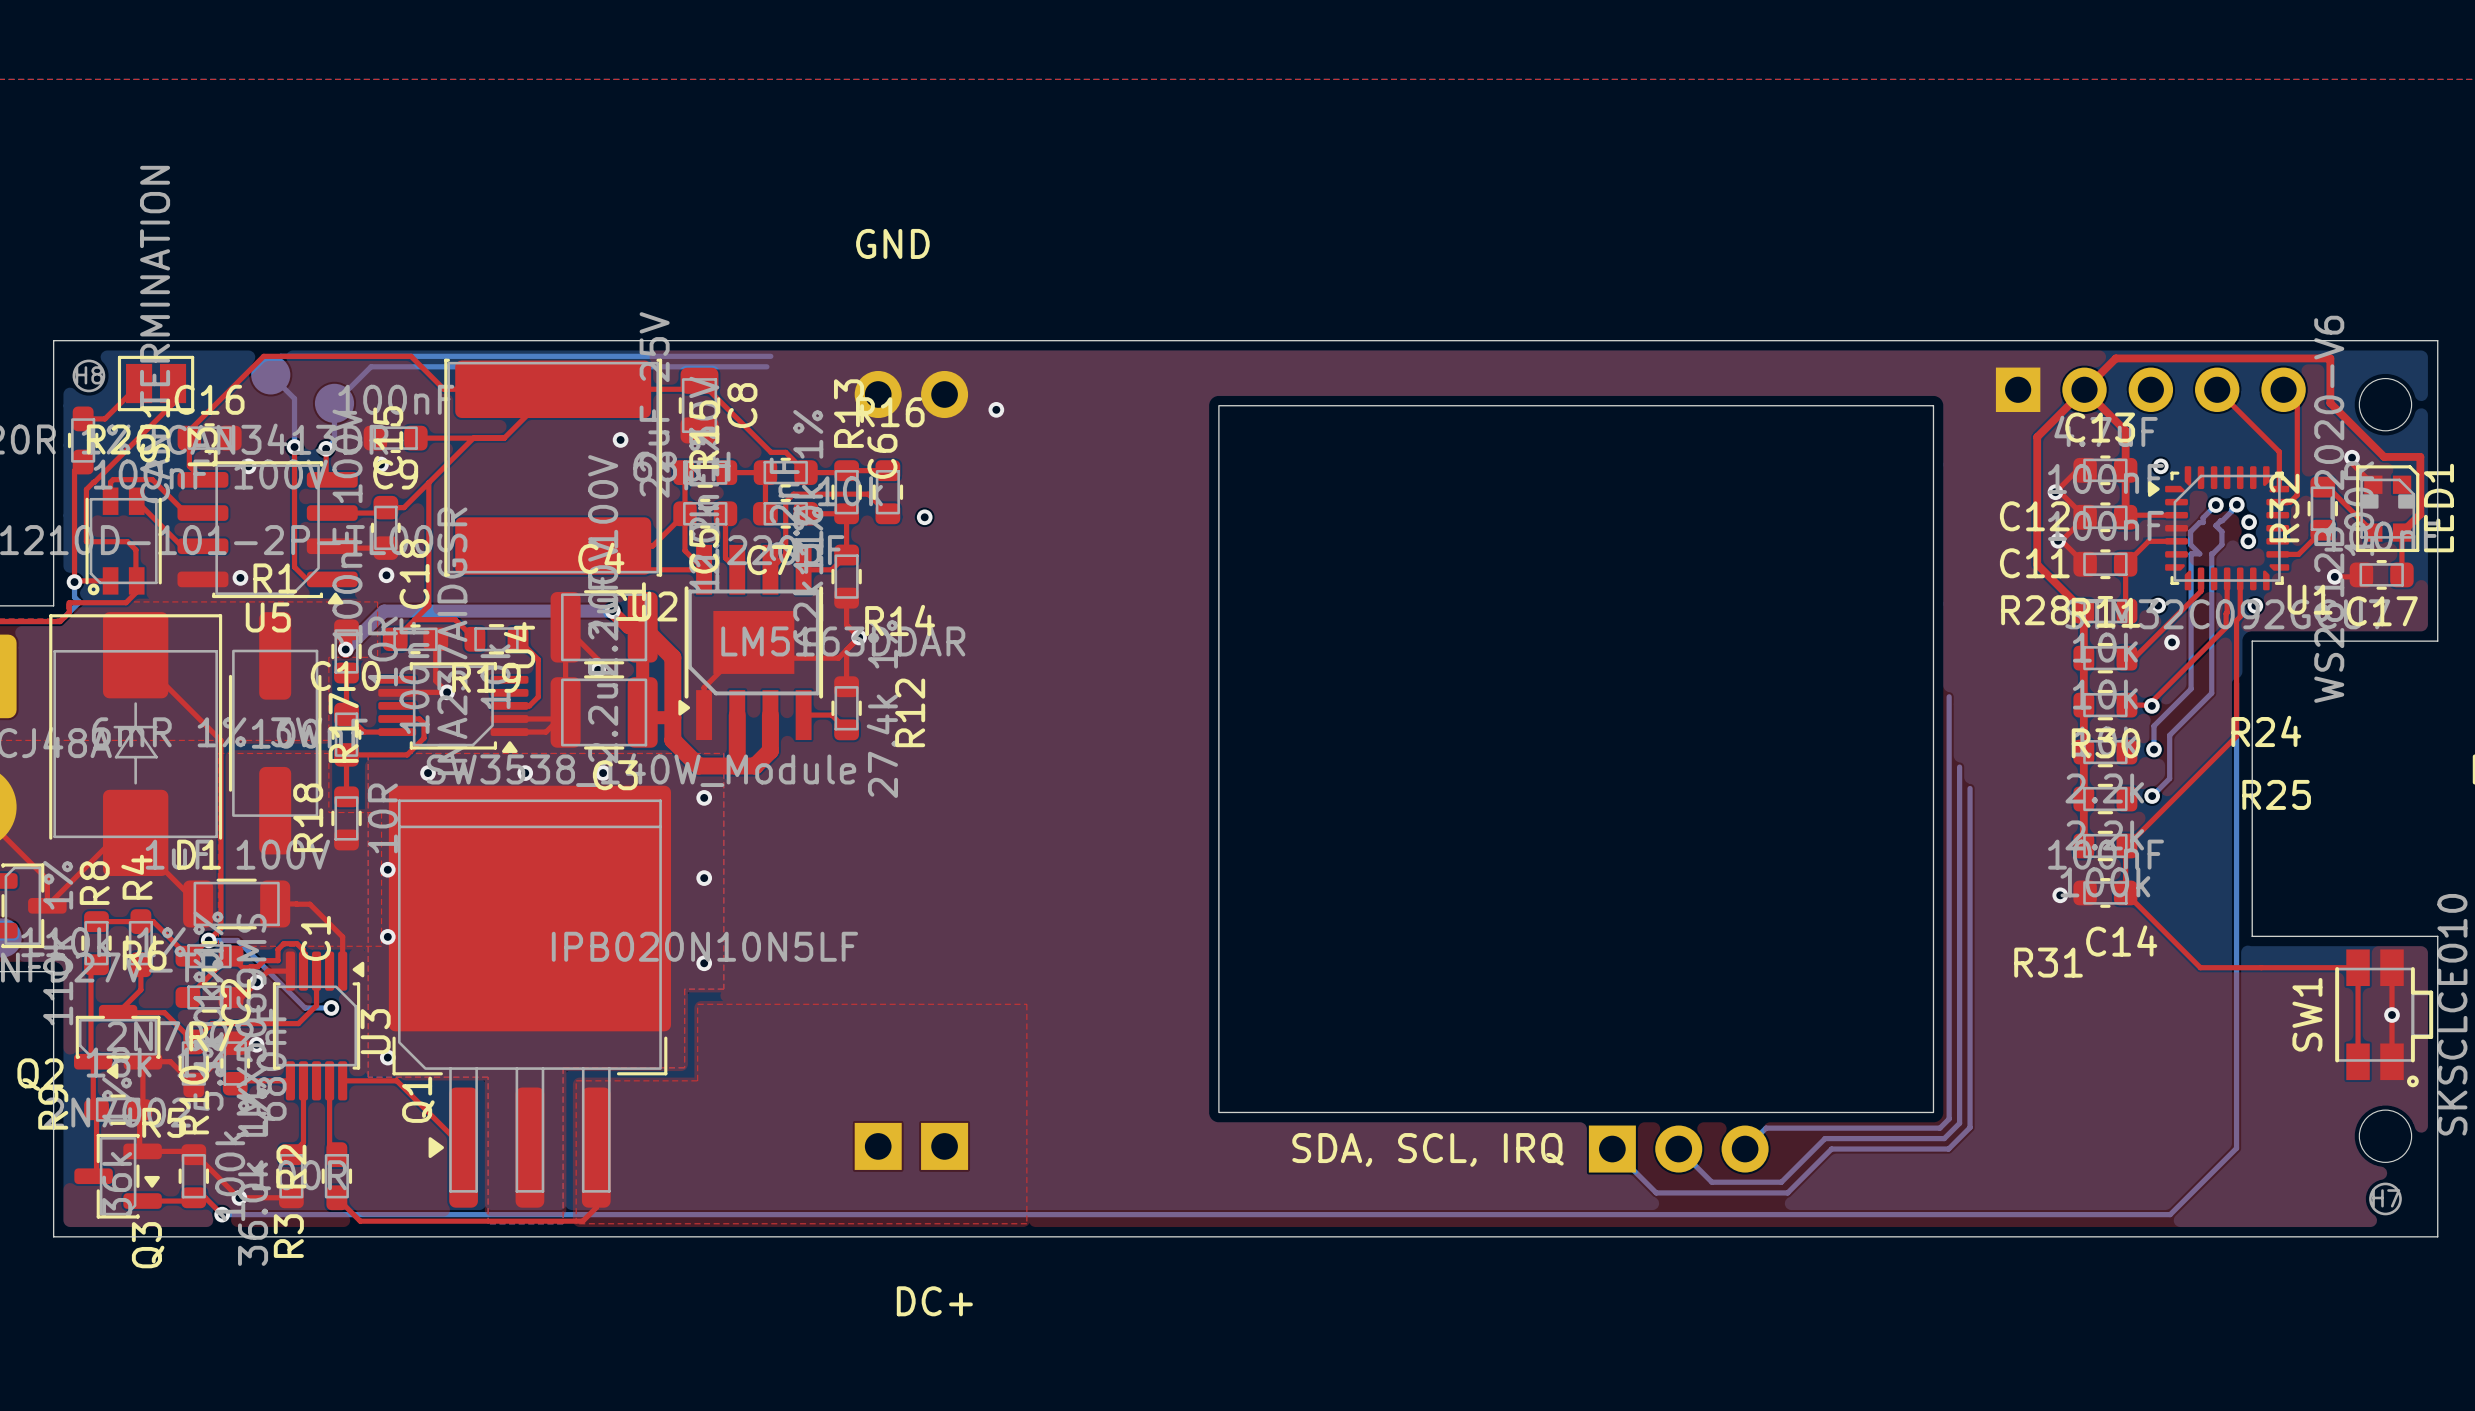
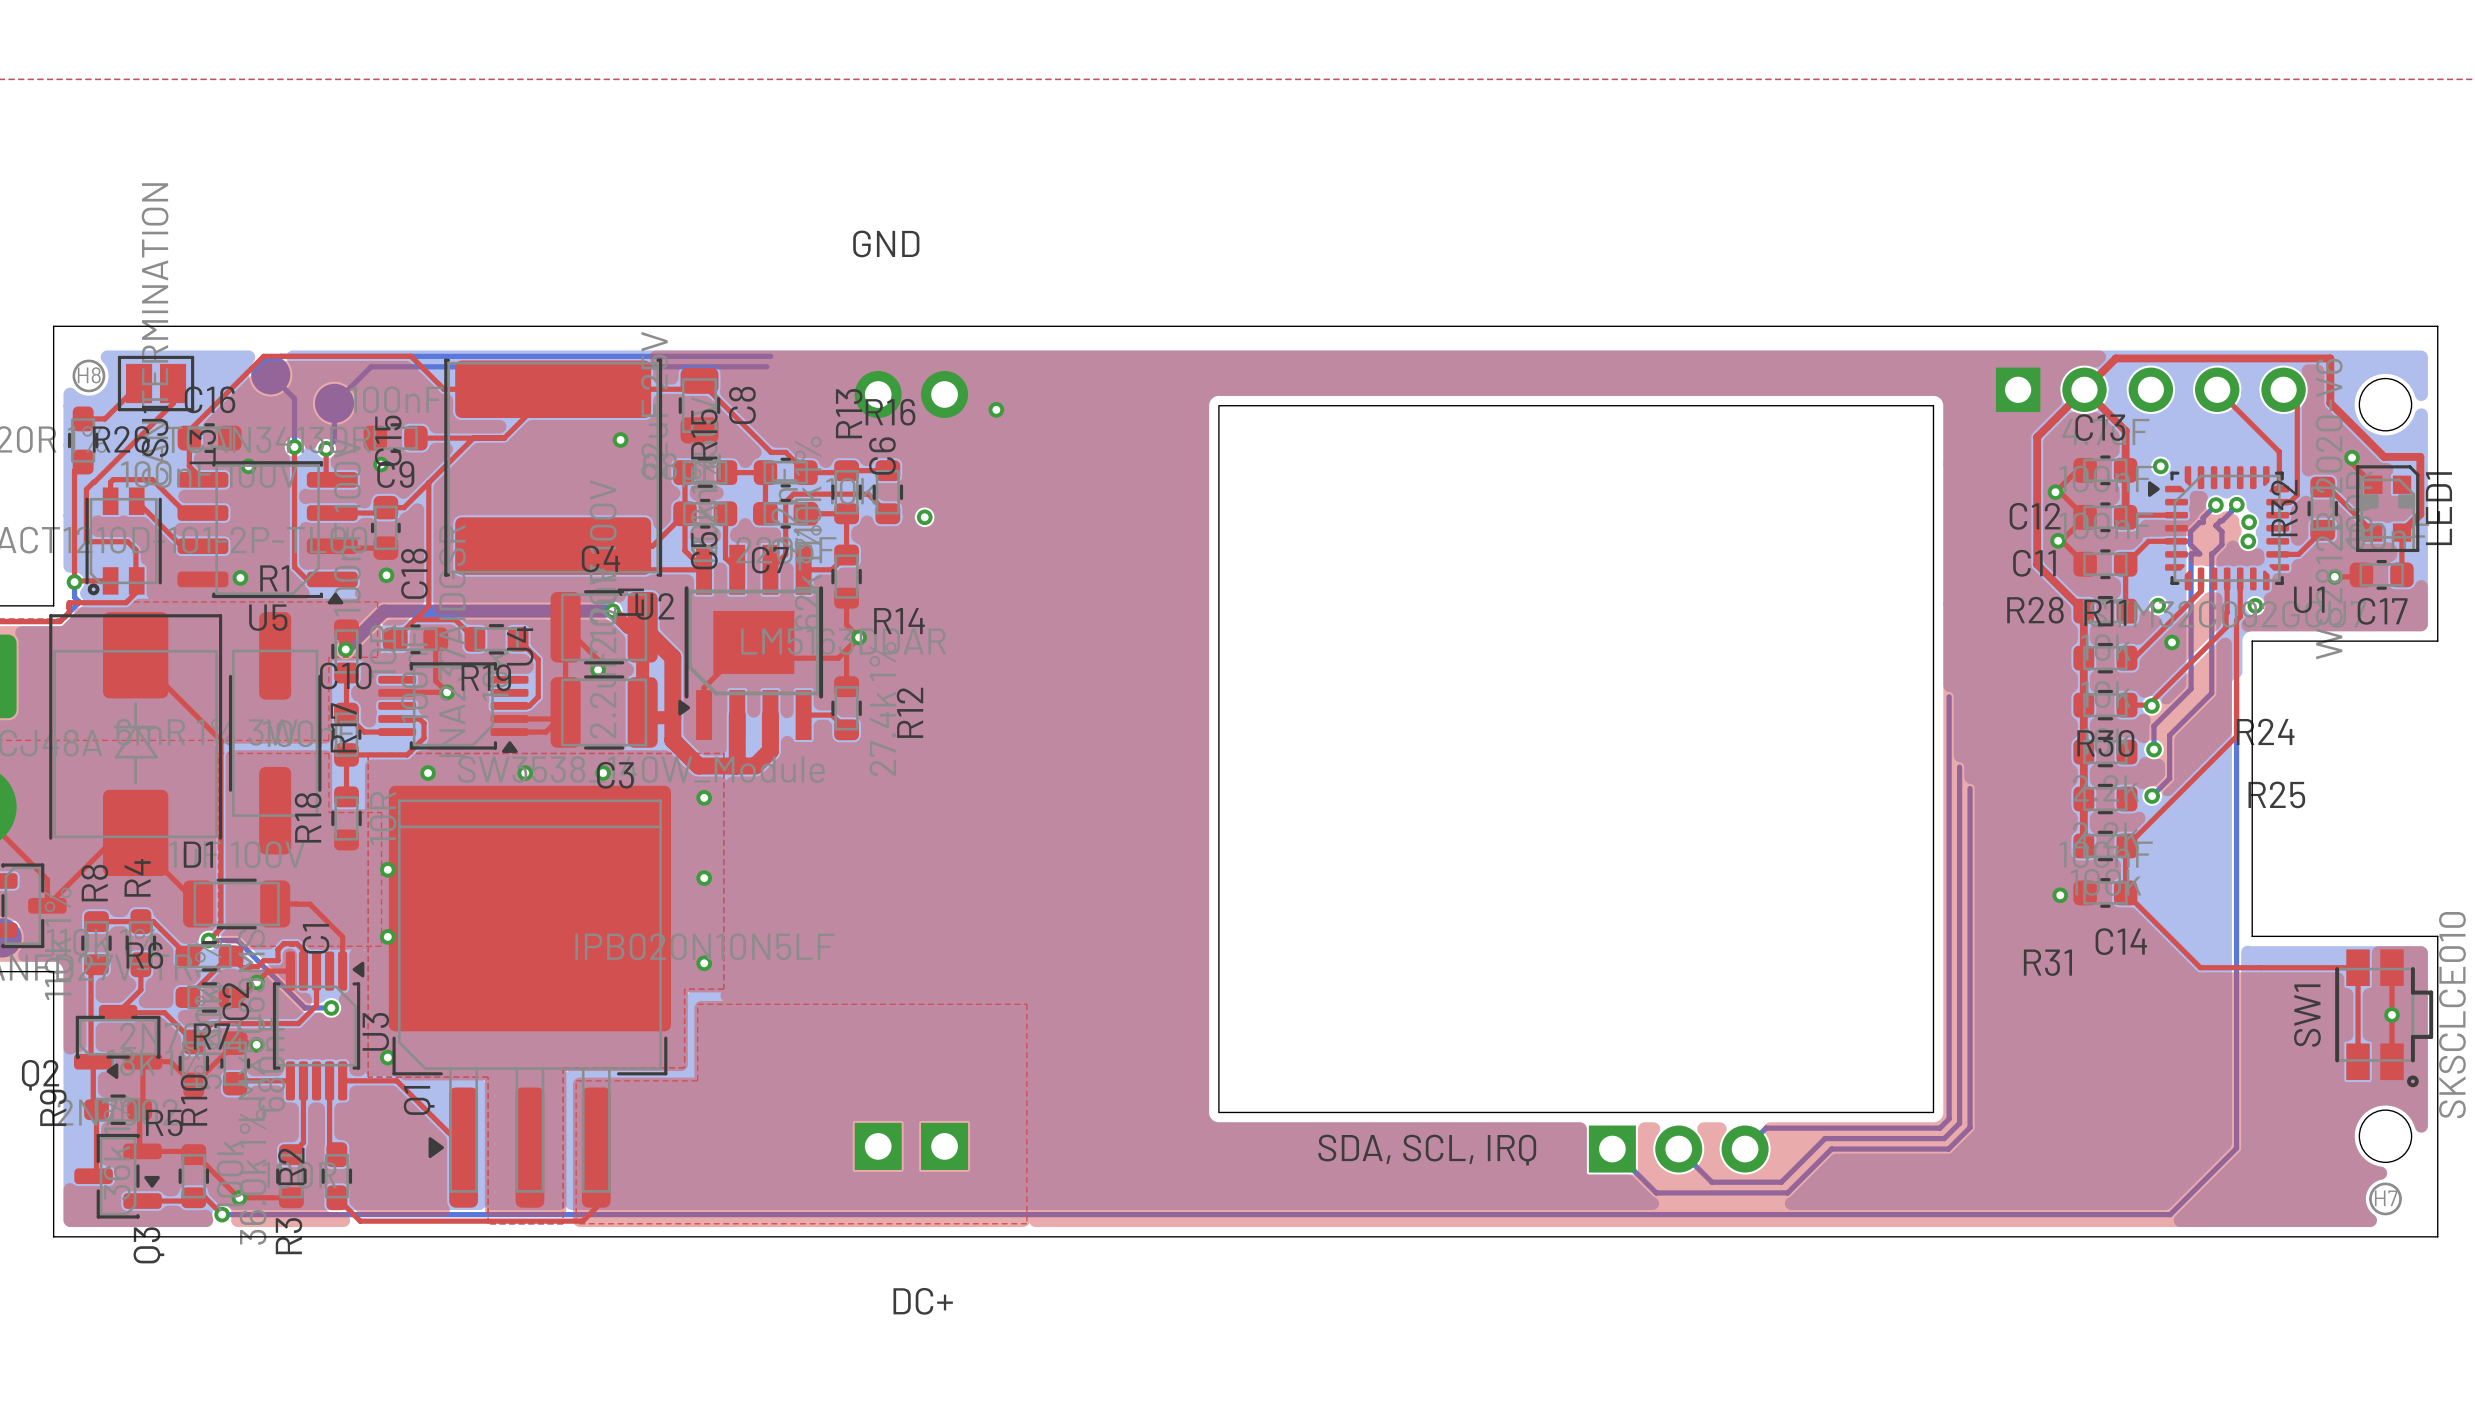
board edge: (53, 340) (2437, 340) -> (53, 340) (53, 326) (2437, 326) (2437, 340)

